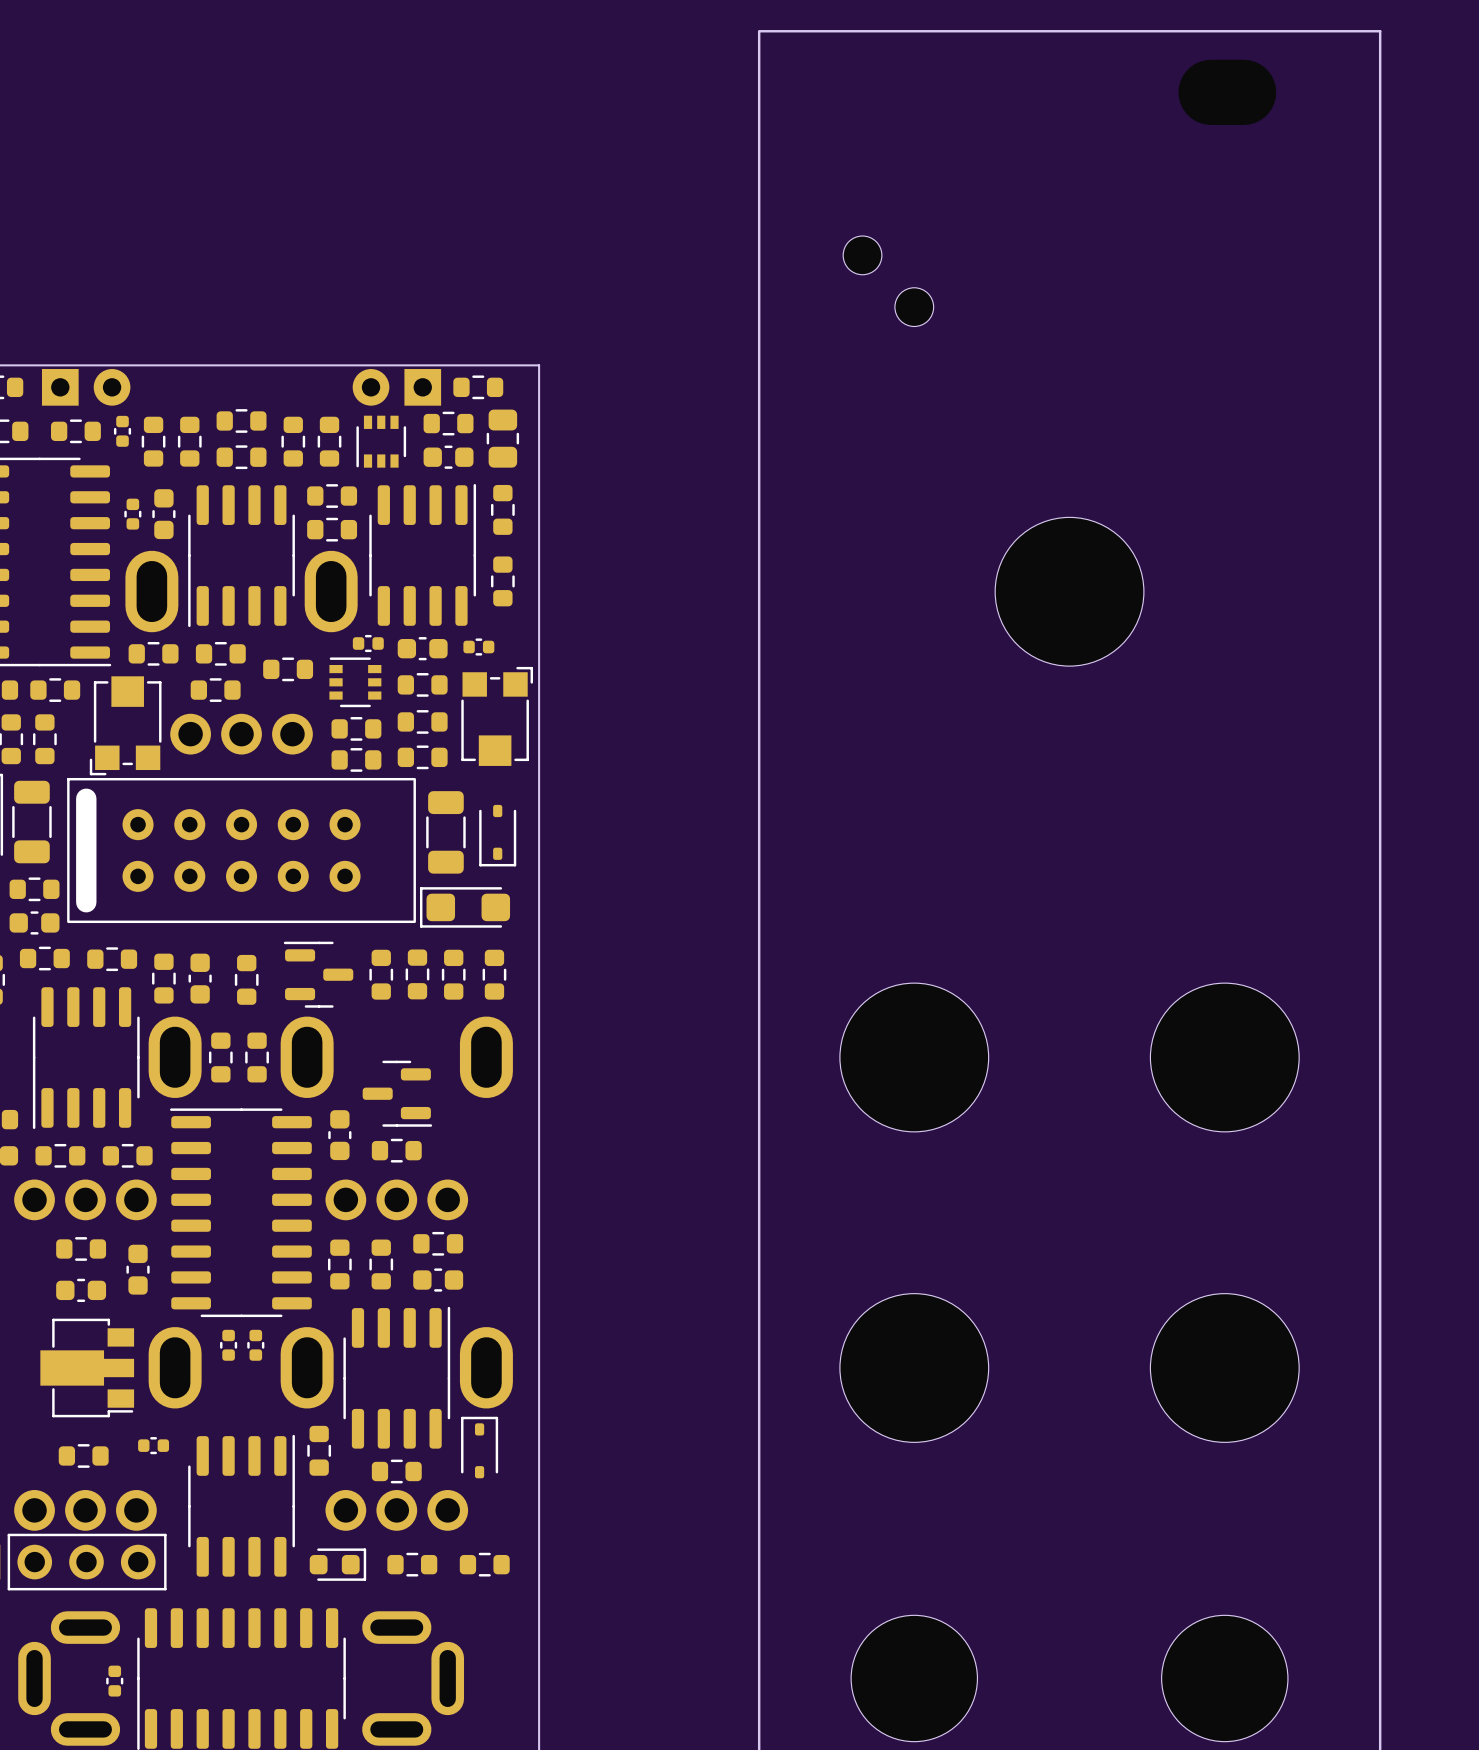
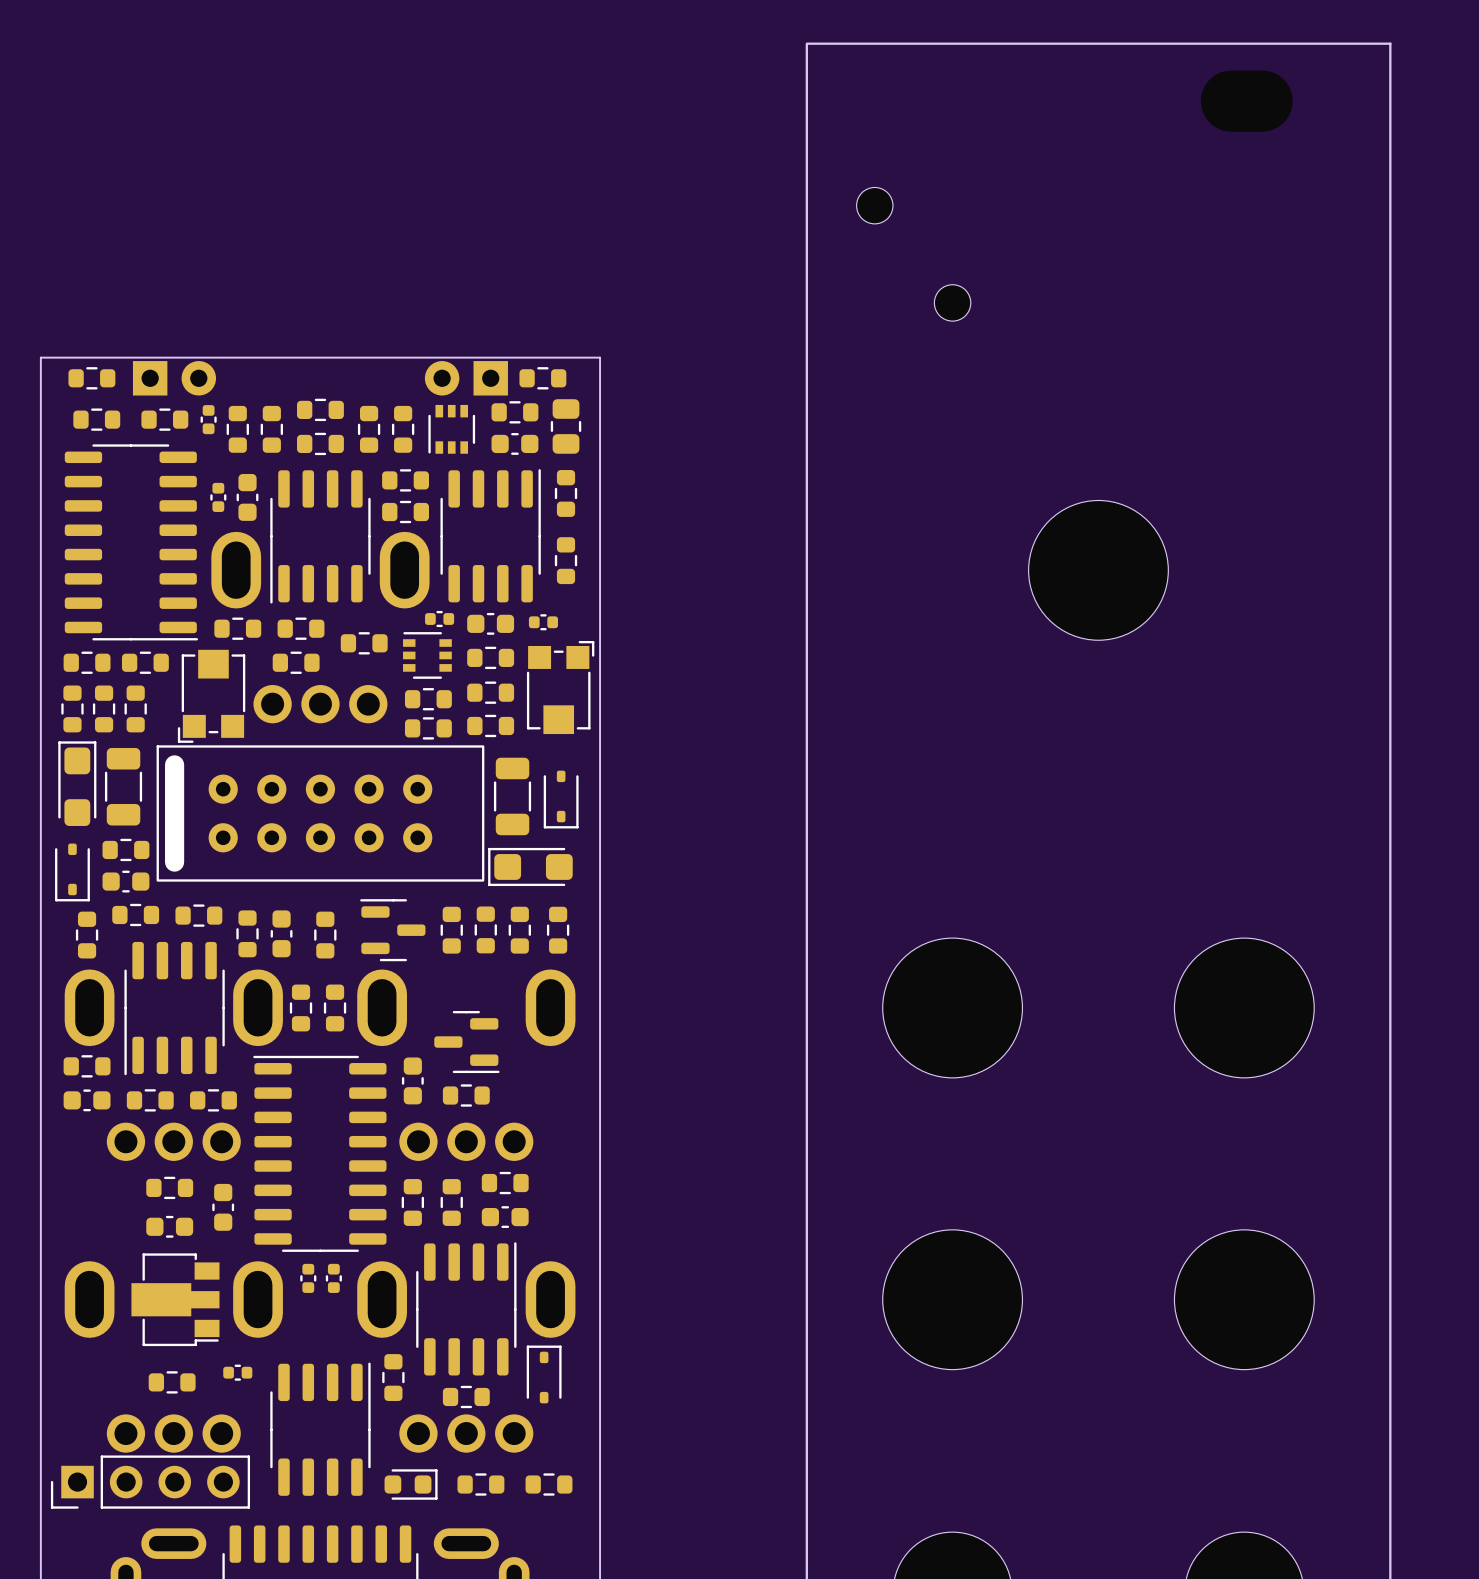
part position: (862, 255) -> (874, 205)

